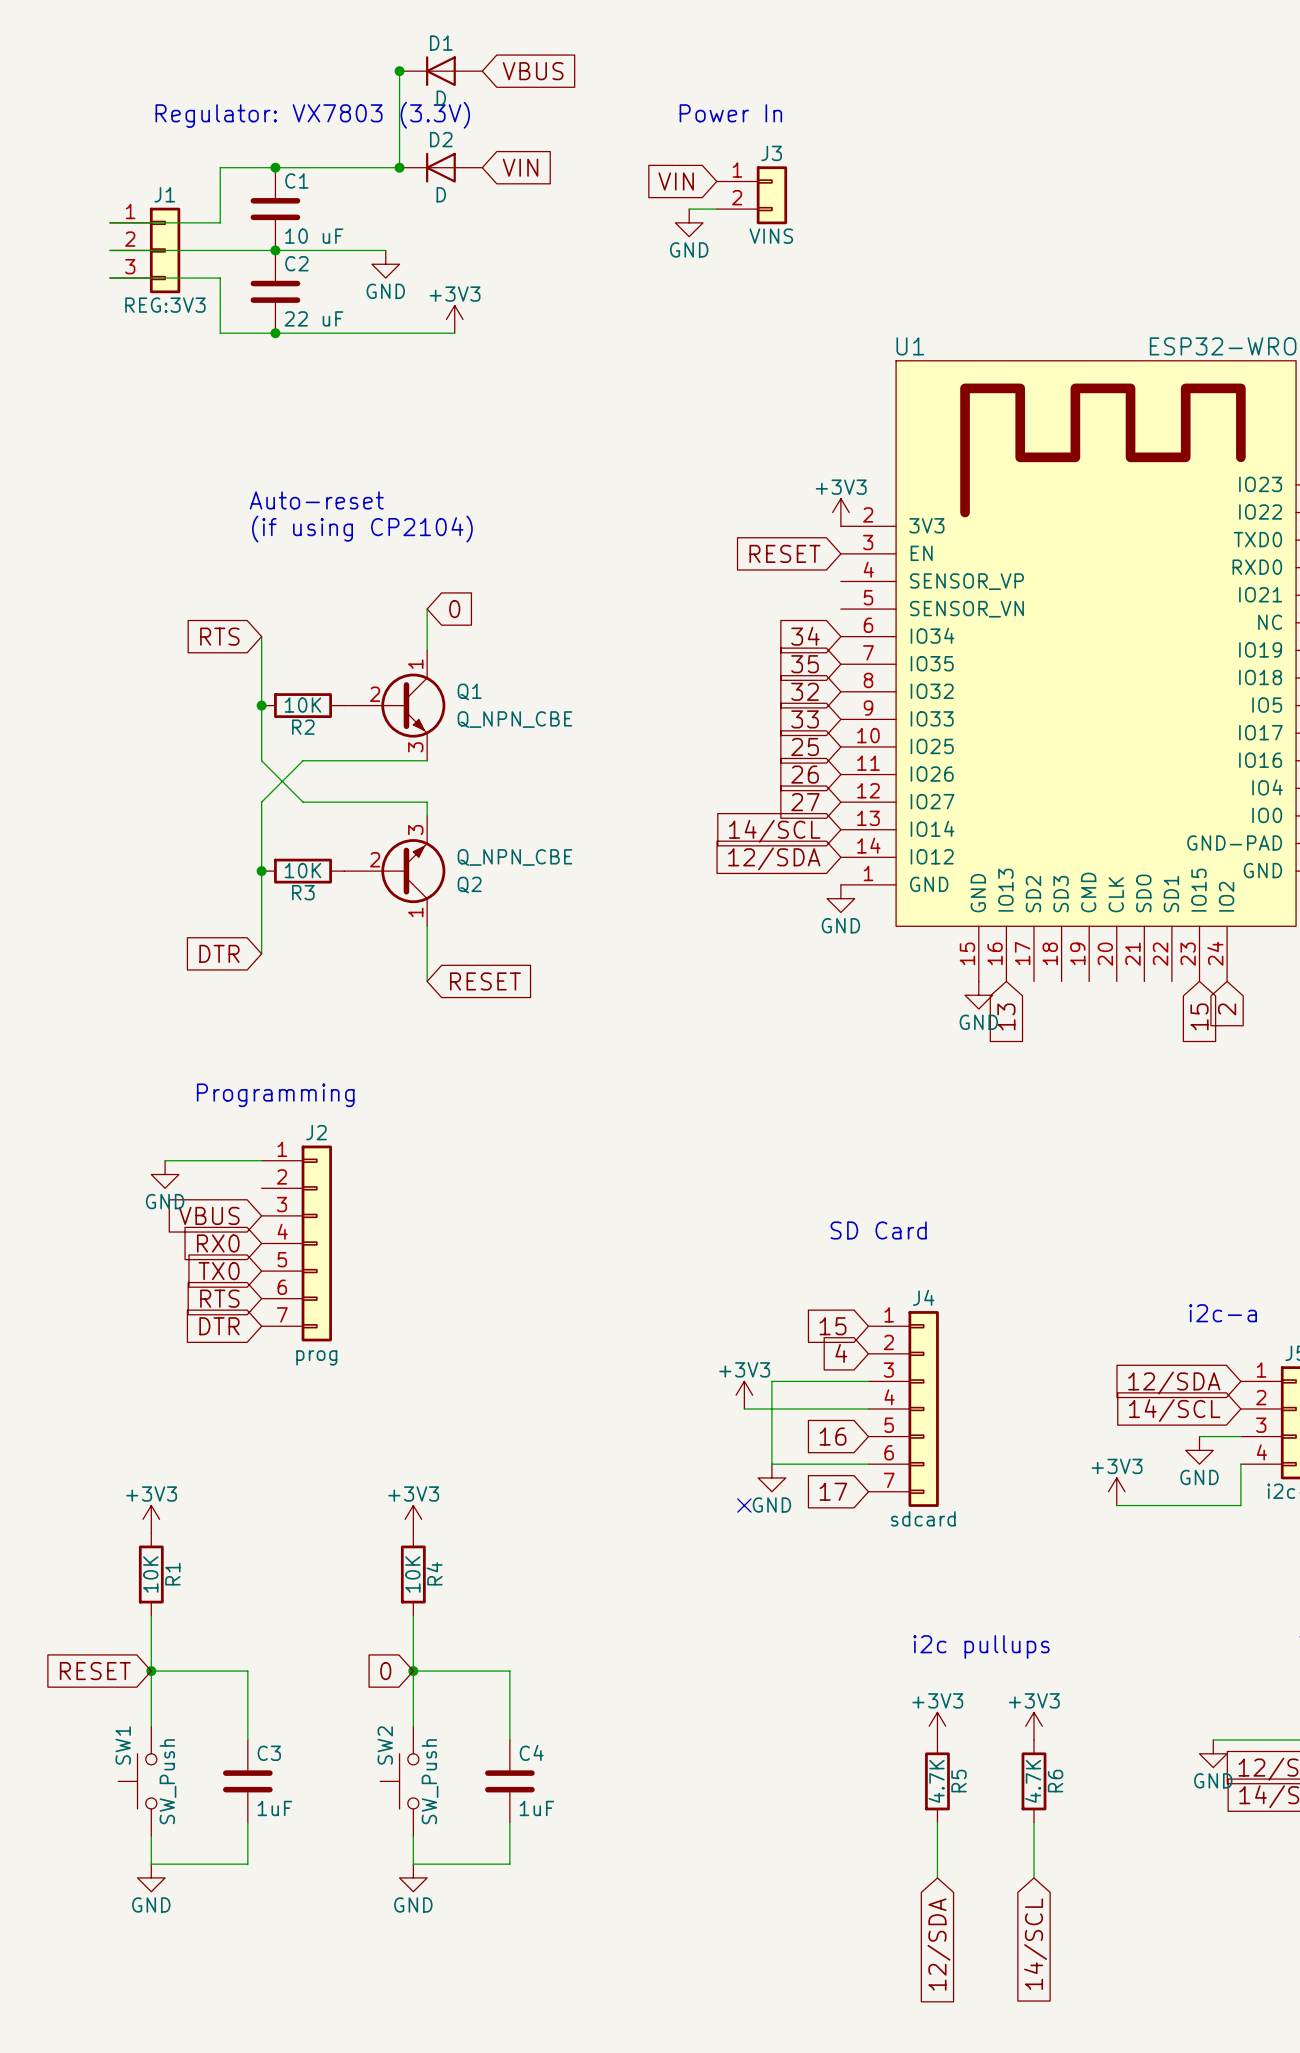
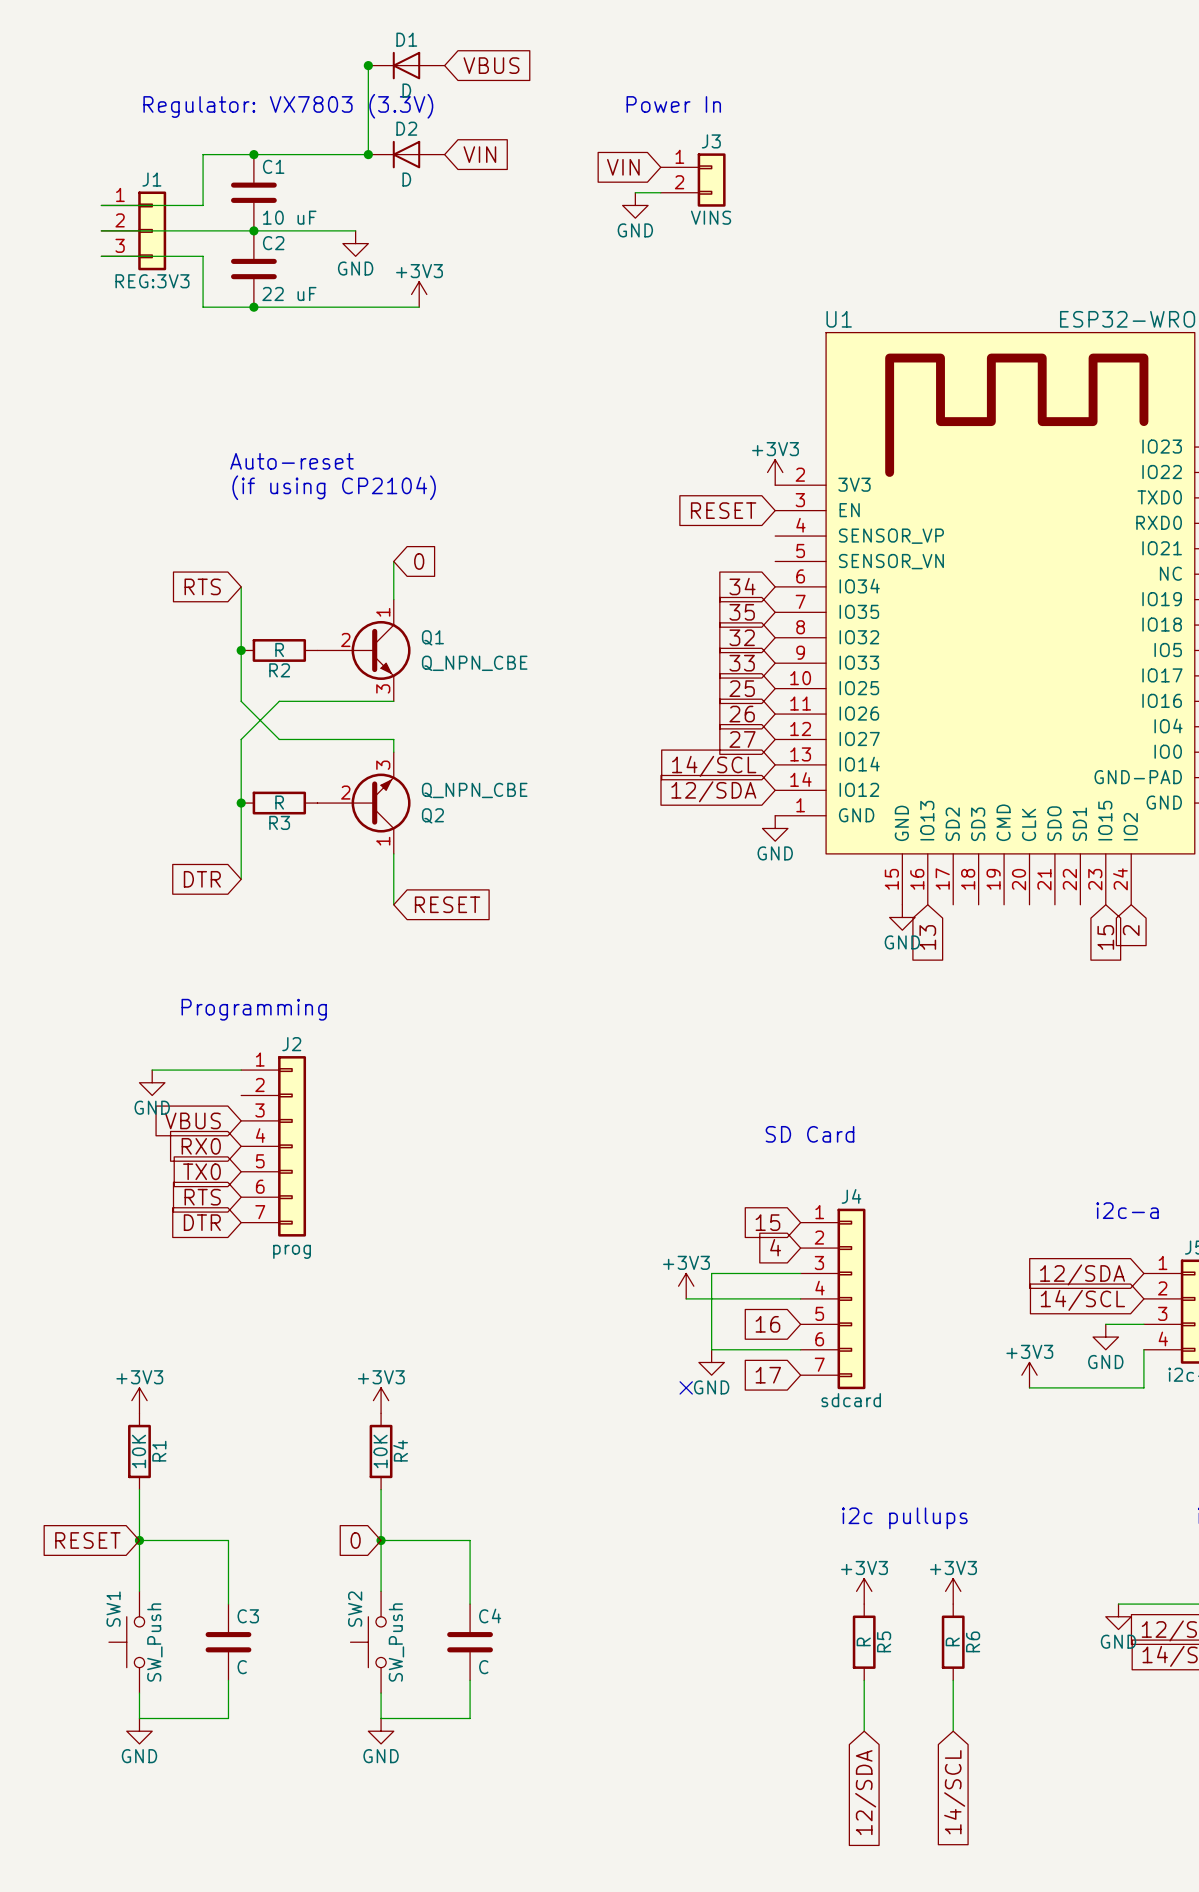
R2 value: 10K (303, 705) -> R (279, 649)
R3 value: 10K (303, 870) -> R (279, 802)
R5 value: 4.7K (936, 1781) -> R (863, 1641)
R6 value: 4.7K (1033, 1781) -> R (952, 1641)
C3 value: 1uF (274, 1808) -> C (242, 1667)
C4 value: 1uF (536, 1808) -> C (483, 1667)

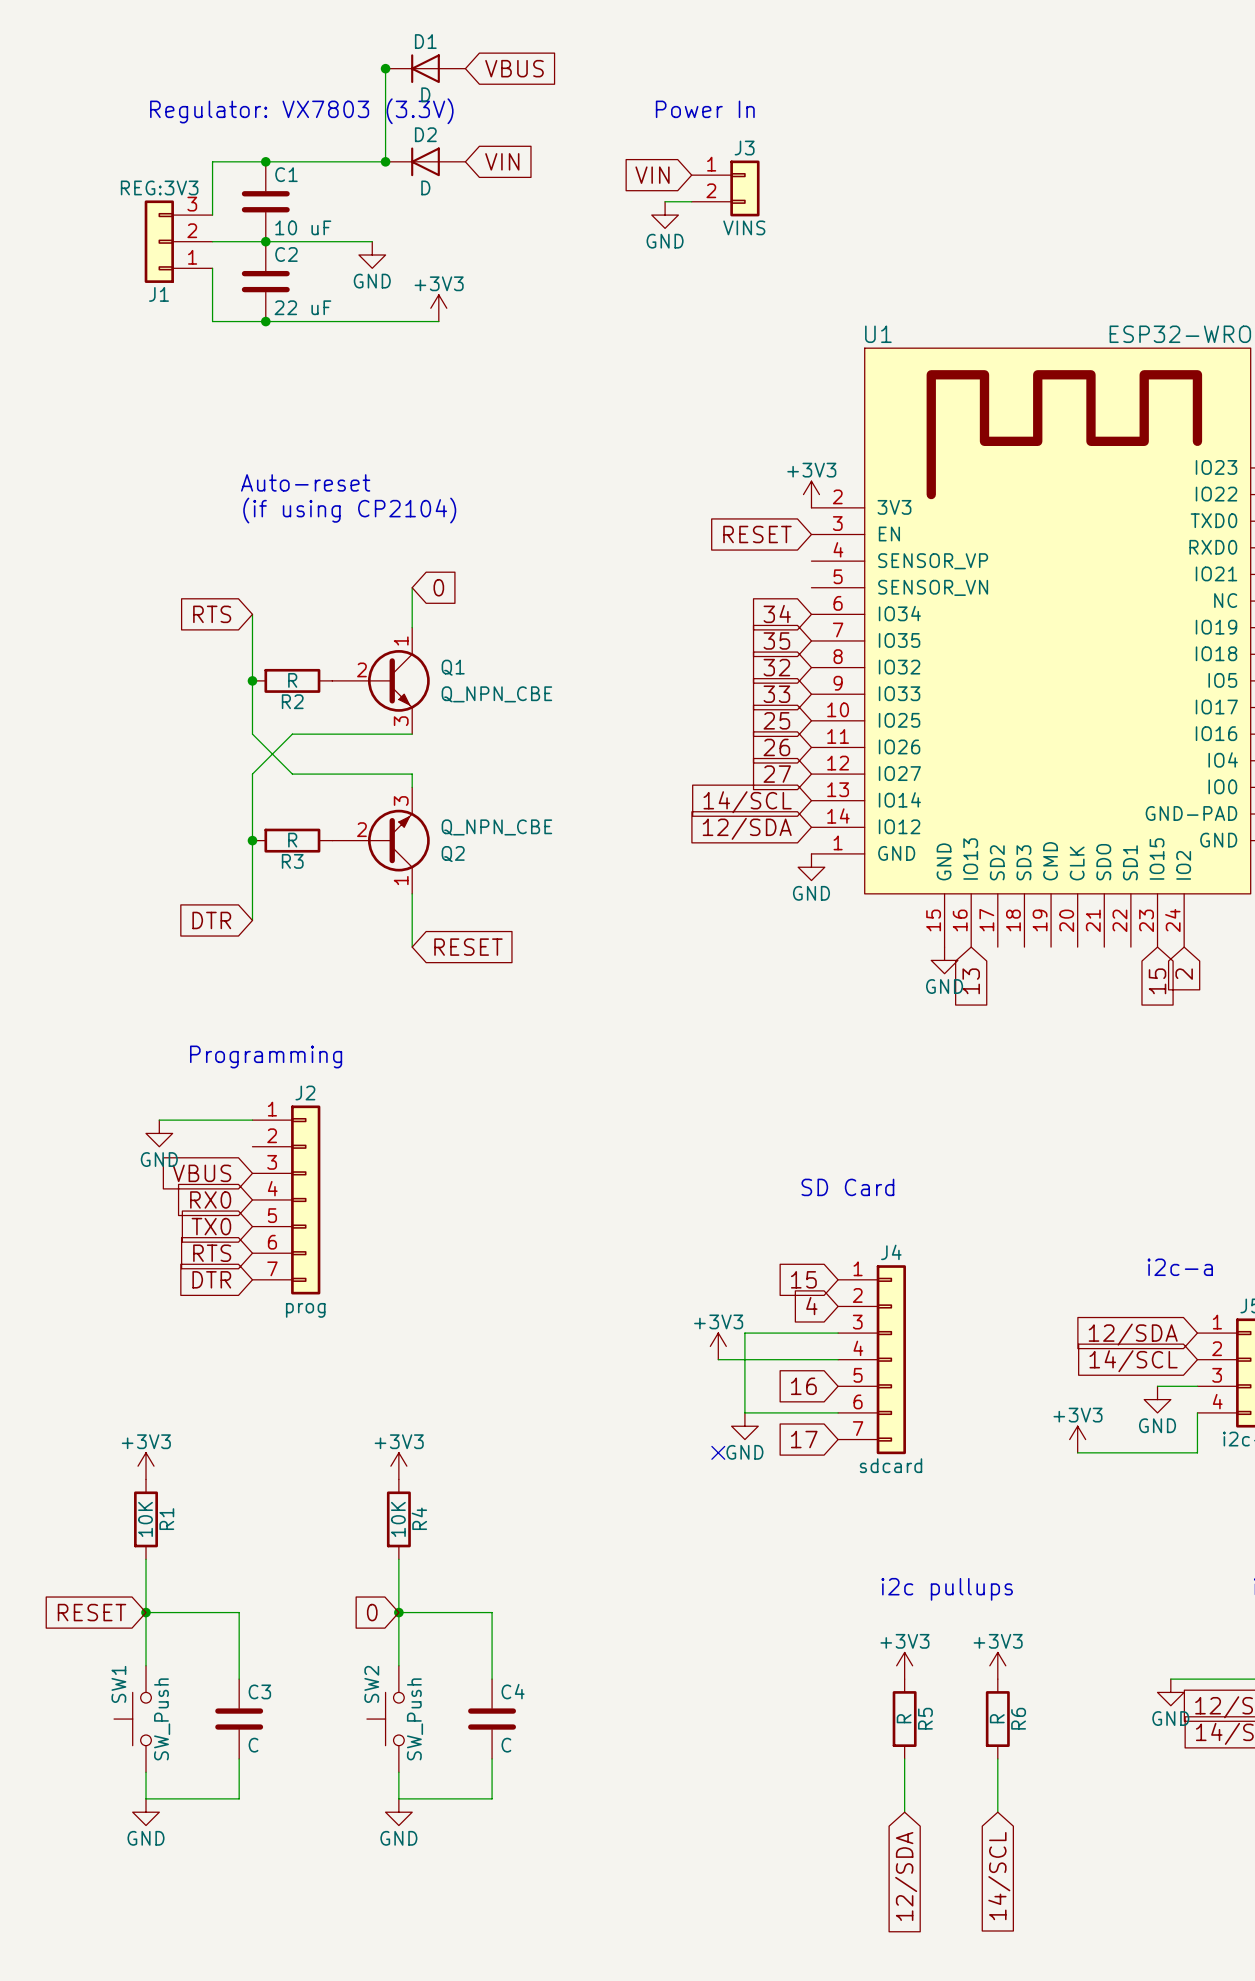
J1 rotation: 0° (152, 230) -> 180° (159, 241)

